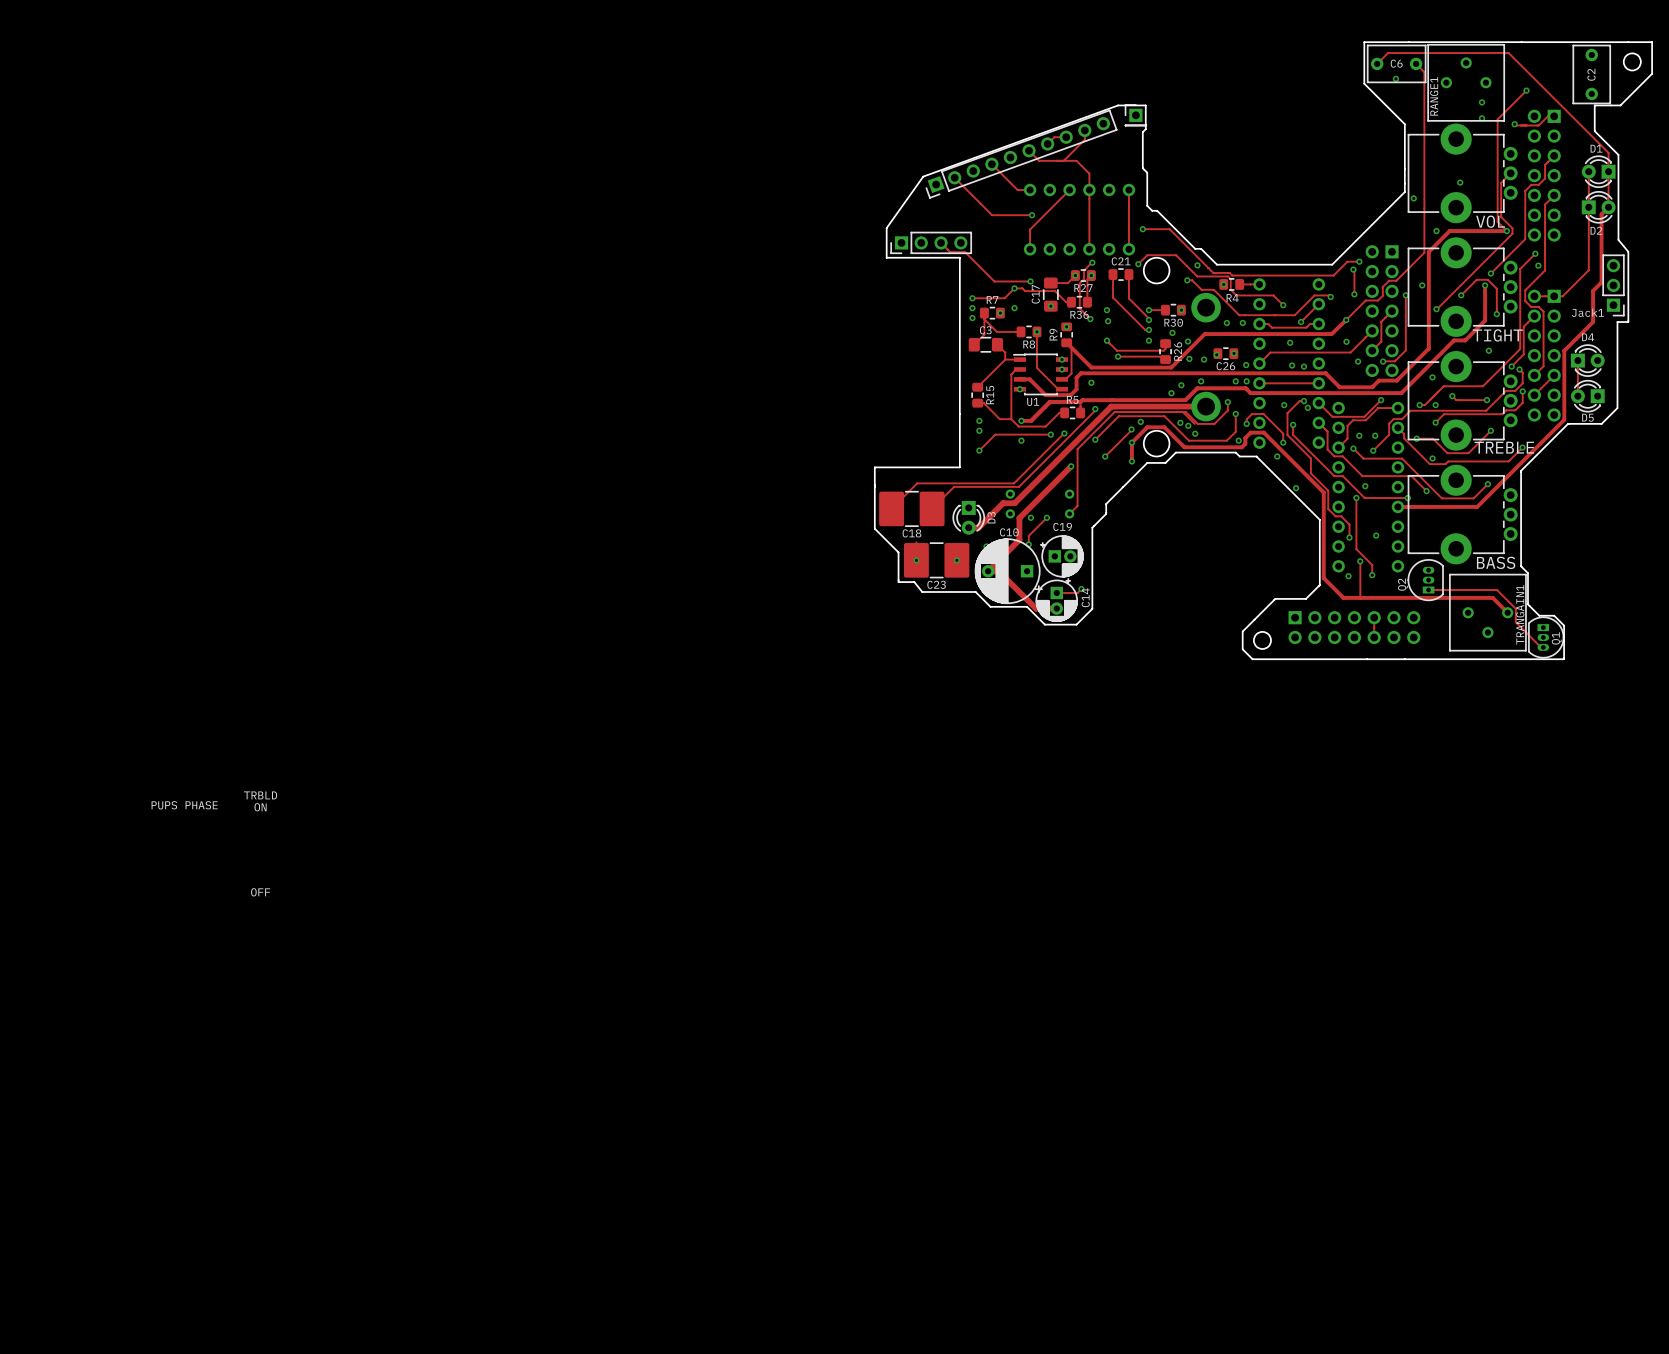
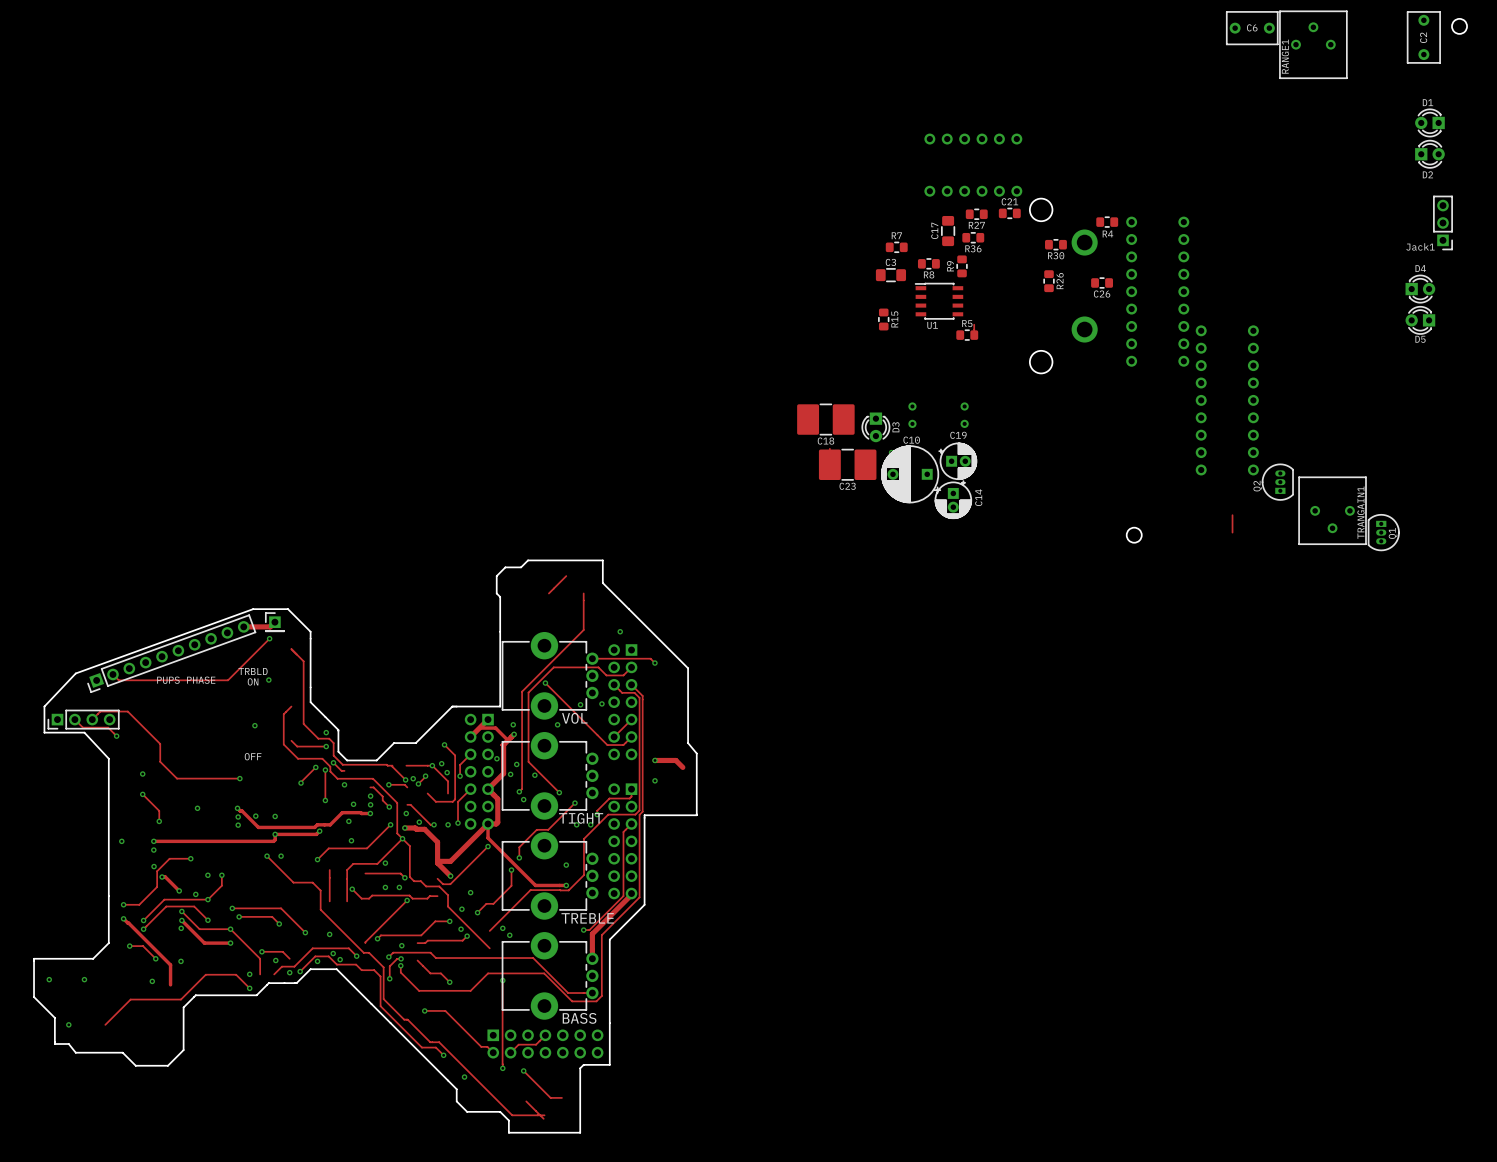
board edge: (1364, 42) (1652, 42) (1652, 73) (1620, 105) (1594, 105) (1594, 131) (1618, 154) (1618, 239) (1628, 251) (1628, 322) (1617, 322) (1617, 408) (1601, 423) (1568, 423) (1521, 470) (1521, 566) (1527, 573) (1527, 604) (1539, 615) (1554, 615) (1564, 625) (1564, 659) (1252, 659) (1242, 649) (1242, 631) (1275, 598) (1305, 598) (1319, 585) (1319, 519) (1256, 456) (1239, 456) (1235, 452) (1175, 452) (1165, 462) (1147, 462) (1106, 503) (1106, 513) (1092, 527) (1092, 608) (1076, 624) (1044, 624) (1027, 606) (990, 606) (975, 591) (922, 591) (914, 582) (898, 582) (898, 552) (874, 528) (874, 467) (959, 467) (959, 257) (886, 257) (886, 228) (923, 176) (1118, 105) (1145, 105) (1145, 129) (1142, 132) (1142, 168) (1147, 172) (1147, 205) (1152, 210) (1157, 210) (1195, 248) (1201, 248) (1216, 264) (1332, 264) (1404, 191) (1404, 124) (1364, 83) (1364, 42) -> none
track: (1377, 63) (1388, 53) (1508, 53) (1608, 152) (1608, 207) (1601, 214) (1601, 282) (1593, 290) (1593, 322) (1564, 350) (1564, 419) (1477, 506) (1397, 506) -> none
track: (1416, 63) (1424, 72) (1424, 252) (1396, 280) (1389, 280) (1382, 286) (1382, 295) (1378, 300) (1365, 300) (1331, 334) (1204, 334) (1171, 367) (1091, 367) (1066, 342) (1071, 347) (1071, 373) (1065, 379) (1061, 379) -> none
via: (1395, 78) -> none
track: (1526, 90) (1497, 119) (1497, 221) (1506, 231) (1449, 231) (1428, 251) (1428, 348) (1396, 380) (1378, 380) (1372, 387) (1339, 387) (1325, 373) (1080, 373) (1076, 377) (1076, 389) (1070, 395) (1045, 395) (1029, 379) (1019, 379) -> none
via: (1526, 90) -> none
via: (1482, 102) -> none
part: (1135, 115) -> none
track: (1554, 116) (1547, 116) (1538, 125) (1514, 124) -> none
via: (1482, 118) -> none
via: (1514, 124) -> none
track: (1084, 130) (1084, 139) (1063, 160) -> none
track: (1066, 137) (1054, 137) (1047, 143) -> none
track: (1029, 150) (1039, 160) (1076, 160) (1089, 173) (1089, 249) -> none
part: (1021, 154) -> none
track: (1554, 155) (1545, 165) (1545, 178) (1538, 184) (1531, 184) (1525, 191) (1525, 239) (1490, 273) -> none
track: (991, 164) (1017, 190) (1030, 190) -> none
track: (1588, 171) (1588, 270) (1562, 296) (1534, 296) -> none
VOL: (1462, 173) -> none
track: (1510, 173) (1501, 182) (1501, 216) (1512, 228) (1512, 233) (1436, 309) -> none
part: (1544, 175) -> none
track: (954, 177) (992, 215) (1032, 215) -> none
via: (1460, 182) -> none
track: (1069, 190) (1030, 229) (1030, 249) -> none
track: (1128, 190) (1128, 249) -> none
track: (1554, 195) (1545, 204) (1545, 270) (1525, 290) (1525, 301) (1531, 306) (1538, 306) (1543, 311) (1543, 366) (1534, 375) -> none
via: (1413, 198) -> none
via: (1032, 215) -> none
track: (1142, 229) (1169, 229) (1213, 272) (1229, 272) (1232, 275) (1333, 275) (1347, 261) (1359, 261) -> none
via: (1142, 229) -> none
via: (1436, 231) -> none
via: (1506, 231) -> none
part: (931, 242) -> none
track: (941, 242) (950, 252) (965, 252) (994, 281) (1030, 281) -> none
track: (1535, 253) (1520, 268) (1520, 349) (1482, 386) (1443, 386) (1424, 405) (1419, 405) -> none
via: (1535, 253) -> none
via: (1359, 261) -> none
track: (1092, 262) (1083, 270) (1083, 279) (1079, 283) (1079, 308) (1090, 319) -> none
via: (1092, 262) -> none
track: (1138, 264) (1147, 255) (1176, 255) (1197, 276) (1228, 276) (1230, 279) (1230, 289) (1236, 295) (1273, 295) (1283, 305) -> none
via: (1138, 264) -> none
via: (1197, 265) -> none
via: (1538, 265) -> none
track: (1353, 269) (1354, 294) -> none
via: (1353, 269) -> none
via: (1490, 273) -> none
track: (1112, 274) (1112, 297) (1145, 329) (1148, 329) -> none
track: (1128, 274) (1128, 298) (1148, 320) -> none
track: (1075, 275) (1067, 283) (1050, 283) -> none
via: (1075, 275) -> none
track: (1091, 275) (1087, 279) (1087, 302) -> none
via: (1091, 275) -> none
track: (1187, 280) (1192, 280) (1201, 289) (1213, 289) (1239, 315) (1294, 315) (1314, 295) (1330, 297) -> none
via: (1187, 280) -> none
via: (1030, 281) -> none
via: (1223, 284) -> none
track: (1239, 284) (1259, 284) -> none
via: (1422, 285) -> none
track: (1485, 285) (1485, 320) (1465, 340) (1454, 340) (1401, 393) (1250, 393) (1245, 388) (1197, 388) (1185, 400) (1082, 400) (1080, 402) (1050, 402) (1031, 420) (1021, 420) (1029, 420) (1049, 401) (1185, 401) (1197, 389) (1246, 389) -> none
via: (1485, 285) -> none
TIGHT: (1462, 287) -> none
via: (1014, 288) -> none
via: (1354, 294) -> none
track: (1405, 295) (1405, 350) (1394, 361) (1383, 361) -> none
via: (1405, 295) -> none
track: (1461, 295) (1476, 279) (1487, 279) (1496, 288) (1496, 314) -> none
via: (1461, 295) -> none
via: (1330, 297) -> none
track: (972, 298) (1004, 298) (1014, 288) (1022, 288) (1025, 291) (1055, 291) (1066, 302) (1071, 302) -> none
via: (972, 298) -> none
track: (1318, 304) (1301, 322) -> none
via: (1283, 305) -> none
via: (1050, 306) -> none
via: (972, 308) -> none
via: (1014, 308) -> none
via: (1436, 309) -> none
via: (1106, 310) -> none
track: (1148, 310) (1165, 310) -> none
via: (1148, 310) -> none
via: (1181, 310) -> none
part: (1382, 311) -> none
track: (1392, 311) (1381, 321) (1381, 341) (1372, 350) -> none
track: (984, 313) (984, 334) (974, 344) -> none
via: (1000, 313) -> none
via: (1496, 314) -> none
track: (1534, 316) (1523, 326) (1523, 354) (1511, 366) -> none
via: (972, 318) -> none
track: (984, 319) (997, 331) (1021, 331) -> none
via: (1090, 319) -> none
via: (1148, 320) -> none
via: (1346, 320) -> none
via: (1108, 321) -> none
via: (1301, 322) -> none
via: (1226, 323) -> none
via: (1242, 323) -> none
track: (1259, 324) (1268, 324) (1271, 327) (1306, 327) (1310, 324) (1318, 324) -> none
via: (1066, 326) -> none
via: (1148, 329) -> none
track: (1372, 330) (1350, 352) (1270, 352) (1259, 363) -> none
track: (1036, 331) (1036, 367) (1058, 389) (1061, 389) -> none
via: (1036, 331) -> none
via: (1172, 332) -> none
track: (1106, 340) (1116, 350) (1163, 350) (1165, 343) -> none
via: (1106, 340) -> none
via: (1148, 340) -> none
via: (1188, 341) -> none
via: (1346, 341) -> none
via: (1290, 342) -> none
track: (997, 344) (1005, 352) (1005, 359) -> none
via: (1488, 350) -> none
via: (1234, 353) -> none
via: (1216, 354) -> none
part: (1544, 355) -> none
track: (1118, 356) (1162, 356) (1165, 359) -> none
via: (1118, 356) -> none
via: (1189, 358) -> none
track: (1005, 359) (1019, 359) -> none
track: (1005, 359) (977, 387) -> none
via: (1061, 359) -> none
via: (1204, 359) -> none
track: (1577, 360) (1577, 396) -> none
via: (1358, 361) -> none
via: (1383, 361) -> none
via: (1246, 365) -> none
via: (1292, 365) -> none
via: (1303, 366) -> none
via: (1511, 366) -> none
track: (1019, 369) (1016, 369) (1011, 374) (1011, 419) -> none
via: (1061, 369) -> none
track: (1519, 369) (1522, 372) (1522, 383) (1515, 390) (1506, 390) (1486, 410) (1410, 410) (1402, 419) (1393, 419) (1389, 423) (1389, 434) (1373, 450) -> none
via: (1519, 369) -> none
track: (1554, 375) (1534, 395) -> none
via: (1432, 377) -> none
via: (1201, 381) -> none
via: (1235, 381) -> none
via: (1246, 381) -> none
via: (1091, 382) -> none
track: (1259, 383) (1318, 383) -> none
via: (1181, 385) -> none
via: (1019, 389) -> none
track: (1522, 391) (1522, 402) (1515, 410) (1506, 410) (1502, 414) (1444, 414) (1435, 422) -> none
via: (1522, 391) -> none
via: (1171, 393) -> none
track: (1452, 396) (1456, 400) (1486, 400) -> none
via: (1452, 396) -> none
track: (1381, 400) (1364, 416) (1332, 416) (1318, 403) -> none
via: (1381, 400) -> none
TREBLE: (1462, 400) -> none
via: (1486, 400) -> none
track: (1303, 401) (1299, 401) (1287, 413) (1287, 435) (1310, 458) (1310, 473) (1328, 490) (1328, 508) (1335, 516) (1341, 516) (1349, 524) (1349, 537) -> none
via: (1303, 401) -> none
track: (1227, 402) (1227, 410) (1214, 423) (1197, 423) (1185, 412) (1114, 412) (1077, 449) (1077, 505) (1069, 513) -> none
via: (1227, 402) -> none
track: (977, 403) (983, 403) (999, 419) (1011, 419) -> none
via: (1284, 405) -> none
via: (1419, 405) -> none
via: (1435, 405) -> none
track: (1206, 406) (1111, 406) (1014, 503) (1003, 503) (978, 527) (968, 527) -> none
via: (1307, 407) -> none
track: (1397, 408) (1378, 408) (1365, 420) (1353, 420) (1347, 425) (1347, 438) (1338, 447) -> none
track: (1095, 409) (1018, 486) (954, 486) (932, 508) -> none
via: (1095, 409) -> none
track: (1064, 412) (1059, 412) (1045, 426) (1018, 426) (1011, 419) -> none
track: (1182, 412) (1194, 423) -> none
track: (1235, 413) (1235, 431) (1226, 440) (1188, 440) (1164, 416) (1118, 416) (1095, 439) -> none
via: (1235, 413) -> none
via: (979, 420) -> none
via: (1021, 420) -> none
via: (1140, 421) -> none
via: (1180, 422) -> none
track: (1318, 422) (1327, 431) (1327, 449) (1334, 456) (1342, 456) (1362, 476) (1411, 476) (1426, 491) -> none
via: (1435, 422) -> none
track: (1246, 423) (1246, 419) (1251, 414) (1263, 414) (1283, 433) (1283, 442) -> none
via: (1246, 423) -> none
track: (1293, 424) (1293, 434) (1334, 476) (1342, 476) (1364, 498) (1407, 498) -> none
via: (1293, 424) -> none
via: (1188, 425) -> none
track: (1397, 427) (1404, 434) (1404, 438) (1429, 464) (1445, 464) (1448, 461) (1508, 461) (1522, 447) -> none
track: (1131, 429) (1105, 456) -> none
via: (1131, 429) -> none
via: (979, 430) -> none
track: (1490, 430) (1468, 453) (1447, 453) (1433, 438) (1416, 438) -> none
via: (1490, 430) -> none
track: (1064, 432) (1014, 483) (917, 483) (891, 508) -> none
via: (1064, 433) -> none
via: (1195, 433) -> none
track: (1050, 434) (995, 434) (979, 450) -> none
via: (1050, 434) -> none
via: (1359, 435) -> none
via: (1375, 435) -> none
via: (1416, 438) -> none
via: (1095, 439) -> none
via: (1021, 440) -> none
via: (1238, 440) -> none
via: (1131, 442) -> none
via: (1283, 442) -> none
via: (1522, 447) -> none
track: (1353, 448) (1363, 458) (1402, 458) (1441, 498) (1473, 498) (1487, 484) -> none
via: (1353, 448) -> none
via: (979, 450) -> none
via: (1373, 450) -> none
via: (1105, 456) -> none
via: (1277, 456) -> none
via: (1432, 458) -> none
track: (1131, 461) (1131, 442) (1147, 427) (1164, 427) (1184, 447) (1241, 447) (1245, 443) (1245, 438) (1250, 432) (1263, 432) (1323, 492) (1323, 578) (1343, 597) (1492, 597) (1507, 612) -> none
via: (1131, 461) -> none
track: (1071, 466) (1019, 518) (1019, 539) (988, 571) (998, 571) (1035, 608) (1056, 608) -> none
via: (1071, 466) -> none
via: (1487, 484) -> none
via: (1365, 486) -> none
via: (1296, 488) -> none
via: (1426, 491) -> none
track: (1356, 497) (1356, 549) (1372, 564) (1372, 575) -> none
via: (1356, 497) -> none
via: (1407, 498) -> none
BASS: (1462, 514) -> none
via: (1030, 517) -> none
track: (1046, 517) (1028, 535) (1028, 544) -> none
via: (1046, 517) -> none
via: (1376, 535) -> none
via: (1349, 537) -> none
via: (1028, 544) -> none
via: (916, 560) -> none
via: (956, 560) -> none
track: (1360, 561) (1360, 597) -> none
via: (1360, 561) -> none
via: (1372, 575) -> none
via: (1348, 576) -> none
track: (1081, 589) (1077, 592) (1056, 592) -> none
via: (1081, 589) -> none
track: (1428, 590) (1497, 590) (1515, 608) (1515, 622) (1540, 647) (1543, 647) -> none
part: (1354, 627) -> none
board edge: none -> (528, 560) (521, 567) (505, 567) (496, 576) (496, 593) (500, 596) (500, 706) (452, 706) (415, 743) (394, 743) (376, 760) (347, 760) (338, 751) (338, 730) (310, 702) (310, 631) (287, 609) (253, 609) (75, 673) (44, 706) (44, 732) (84, 732) (108, 758) (108, 943) (93, 958) (34, 958) (34, 997) (54, 1017) (54, 1044) (68, 1044) (75, 1052) (122, 1052) (135, 1065) (167, 1065) (183, 1050) (183, 1007) (195, 995) (256, 995) (268, 983) (296, 983) (310, 969) (336, 969) (456, 1089) (456, 1101) (467, 1111) (500, 1111) (508, 1120) (508, 1132) (580, 1132) (580, 1068) (583, 1064) (609, 1064) (609, 939) (644, 904) (644, 815) (696, 815) (696, 753) (688, 743) (688, 668) (602, 583) (602, 560) (528, 560)
track: none -> (566, 576) (548, 593)
track: none -> (583, 593) (583, 630) (522, 691) (522, 789) (519, 791)
track: none -> (274, 622) (270, 626) (243, 626)
part: none -> (274, 622)
via: none -> (620, 631)
track: none -> (269, 638) (228, 680) (118, 680) (112, 674)
via: none -> (269, 638)
track: none -> (291, 649) (303, 661) (303, 723) (318, 738) (329, 738) (333, 743) (333, 755) (342, 764) (392, 765) (405, 779)
part: none -> (171, 653)
track: none -> (592, 658) (650, 658) (654, 663)
via: none -> (654, 663)
track: none -> (631, 667) (623, 675) (606, 675) (598, 667) (553, 667) (528, 692) (528, 761) (559, 792)
VOL: none -> (550, 675)
via: none -> (268, 680)
track: none -> (545, 683) (607, 745) (623, 745) (631, 736)
via: none -> (545, 683)
track: none -> (614, 684) (622, 692) (634, 692) (639, 697) (639, 810) (635, 814) (608, 814) (584, 838) (584, 875) (568, 890) (530, 890) (489, 930)
track: none -> (631, 684) (642, 695) (642, 811) (639, 814) (639, 897) (601, 935) (601, 995) (596, 1001) (572, 1001) (544, 973) (488, 973) (470, 990) (419, 990) (400, 972) (400, 965)
part: none -> (622, 702)
via: none -> (601, 703)
via: none -> (580, 704)
track: none -> (291, 706) (283, 714) (283, 744) (298, 758) (322, 758) (330, 766) (330, 771) (337, 778) (373, 778) (397, 802) (397, 833) (409, 846) (409, 877) (414, 881) (420, 881) (426, 886) (439, 886) (448, 895) (448, 906) (489, 948)
track: none -> (74, 719) (82, 727) (108, 727) (116, 736)
part: none -> (83, 719)
track: none -> (92, 719) (100, 711) (127, 711) (160, 743) (160, 761) (177, 778) (239, 778)
track: none -> (488, 719) (470, 736) (479, 728) (495, 728) (508, 740)
track: none -> (631, 719) (616, 734)
via: none -> (513, 724)
via: none -> (557, 724)
via: none -> (254, 725)
via: none -> (326, 732)
via: none -> (514, 734)
via: none -> (116, 736)
track: none -> (291, 740) (297, 746) (326, 746)
track: none -> (444, 744) (455, 755) (455, 799) (452, 801) (435, 801) (427, 793)
via: none -> (444, 744)
via: none -> (326, 746)
track: none -> (470, 754) (460, 764) (460, 776)
via: none -> (496, 758)
track: none -> (655, 760) (675, 760) (682, 767)
via: none -> (655, 760)
track: none -> (333, 762) (341, 770) (344, 770)
via: none -> (333, 762)
via: none -> (441, 763)
via: none -> (516, 764)
track: none -> (406, 765) (432, 765) (448, 781) (448, 793)
via: none -> (432, 765)
track: none -> (315, 767) (301, 783)
via: none -> (315, 767)
track: none -> (325, 770) (325, 800)
via: none -> (325, 770)
part: none -> (479, 771)
via: none -> (447, 772)
via: none -> (142, 774)
via: none -> (510, 774)
via: none -> (534, 775)
track: none -> (425, 776) (418, 783)
via: none -> (425, 776)
via: none -> (460, 776)
TIGHT: none -> (550, 775)
via: none -> (239, 778)
via: none -> (413, 778)
via: none -> (405, 779)
via: none -> (655, 780)
via: none -> (301, 783)
via: none -> (418, 783)
via: none -> (344, 784)
track: none -> (388, 784) (404, 784) (407, 787)
via: none -> (388, 784)
track: none -> (370, 787) (373, 787) (382, 796) (382, 800) (389, 807)
track: none -> (470, 789) (458, 801) (458, 823)
track: none -> (488, 789) (501, 775) (501, 745) (501, 745) (503, 745) (514, 734) (503, 744) (503, 773) (488, 789)
track: none -> (488, 789) (497, 798) (497, 822) (488, 823)
track: none -> (631, 789) (629, 798) (609, 798) (597, 810) (597, 814)
via: none -> (519, 791)
via: none -> (559, 792)
track: none -> (142, 794) (159, 810) (159, 821)
via: none -> (142, 794)
via: none -> (370, 796)
via: none -> (523, 799)
via: none -> (325, 800)
track: none -> (574, 803) (548, 829) (536, 829) (519, 847) (519, 857)
via: none -> (574, 803)
via: none -> (353, 804)
via: none -> (370, 804)
track: none -> (407, 804) (410, 804) (430, 824) (434, 824)
via: none -> (389, 807)
via: none -> (197, 808)
track: none -> (237, 808) (258, 827) (314, 827) (317, 824) (330, 824) (342, 812) (370, 813)
via: none -> (237, 808)
via: none -> (370, 813)
via: none -> (406, 813)
via: none -> (597, 814)
via: none -> (255, 816)
via: none -> (238, 817)
via: none -> (275, 816)
via: none -> (159, 821)
via: none -> (348, 821)
via: none -> (419, 822)
via: none -> (458, 823)
track: none -> (488, 823) (488, 837) (535, 885) (566, 885)
track: none -> (488, 823) (450, 861) (437, 861)
track: none -> (631, 823) (623, 832) (623, 896) (589, 930) (583, 930)
track: none -> (390, 824) (367, 848) (328, 848) (317, 859)
via: none -> (390, 824)
via: none -> (434, 824)
via: none -> (448, 824)
via: none -> (576, 824)
via: none -> (590, 824)
via: none -> (238, 825)
track: none -> (404, 828) (424, 829) (437, 842) (437, 863) (450, 876)
via: none -> (404, 828)
track: none -> (319, 831) (316, 834) (275, 834) (273, 841) (153, 841)
via: none -> (319, 831)
via: none -> (275, 834)
track: none -> (402, 838) (377, 863) (353, 863) (347, 870) (347, 901)
via: none -> (402, 838)
via: none -> (351, 840)
via: none -> (121, 841)
via: none -> (153, 841)
part: none -> (622, 841)
track: none -> (488, 846) (450, 884) (443, 884) (437, 878)
via: none -> (488, 846)
via: none -> (153, 850)
track: none -> (267, 856) (293, 882) (312, 882) (320, 890) (320, 909) (363, 952) (369, 952) (383, 967) (383, 999) (404, 1019) (407, 1019) (430, 1042) (439, 1042) (512, 1115) (544, 1115)
via: none -> (267, 856)
via: none -> (281, 856)
via: none -> (519, 857)
track: none -> (190, 858) (169, 858) (157, 871) (157, 886) (139, 904) (123, 904)
via: none -> (190, 858)
via: none -> (317, 859)
via: none -> (385, 863)
via: none -> (566, 865)
via: none -> (154, 866)
track: none -> (329, 870) (329, 901)
track: none -> (511, 870) (511, 885) (493, 903) (486, 903) (477, 912)
via: none -> (511, 870)
track: none -> (365, 873) (400, 873) (404, 877)
via: none -> (207, 875)
track: none -> (221, 875) (221, 885) (207, 899) (164, 899) (143, 920)
via: none -> (221, 875)
TREBLE: none -> (550, 875)
via: none -> (450, 876)
track: none -> (162, 877) (165, 877) (179, 890)
via: none -> (162, 877)
via: none -> (404, 877)
via: none -> (566, 885)
via: none -> (385, 887)
via: none -> (399, 887)
track: none -> (352, 889) (361, 898) (369, 898) (372, 895) (409, 895) (412, 898) (437, 896)
via: none -> (352, 889)
via: none -> (179, 890)
via: none -> (470, 892)
track: none -> (631, 893) (592, 933) (592, 958)
via: none -> (195, 894)
via: none -> (207, 899)
track: none -> (407, 900) (365, 943)
via: none -> (407, 900)
via: none -> (123, 904)
track: none -> (232, 908) (281, 908) (305, 932)
via: none -> (232, 908)
via: none -> (461, 909)
track: none -> (181, 911) (199, 929) (230, 929) (260, 958) (260, 974)
via: none -> (181, 911)
via: none -> (477, 912)
track: none -> (239, 916) (272, 916) (279, 923)
via: none -> (239, 916)
track: none -> (123, 918) (170, 965) (170, 984)
via: none -> (123, 918)
via: none -> (143, 920)
track: none -> (181, 920) (204, 943) (230, 943)
via: none -> (181, 920)
track: none -> (207, 920) (194, 906) (166, 906) (143, 929)
via: none -> (207, 920)
track: none -> (449, 921) (435, 921) (421, 935) (380, 935) (377, 938)
via: none -> (449, 921)
via: none -> (279, 923)
via: none -> (181, 928)
via: none -> (502, 928)
via: none -> (143, 929)
via: none -> (230, 929)
via: none -> (461, 929)
via: none -> (583, 930)
via: none -> (305, 932)
via: none -> (329, 934)
via: none -> (509, 935)
track: none -> (467, 936) (462, 940) (427, 940) (425, 943) (417, 943)
via: none -> (467, 936)
via: none -> (377, 938)
via: none -> (230, 943)
track: none -> (129, 946) (143, 946) (155, 958)
via: none -> (129, 946)
via: none -> (401, 945)
track: none -> (261, 951) (282, 951) (289, 958)
via: none -> (261, 951)
via: none -> (333, 953)
track: none -> (356, 956) (348, 948) (312, 948) (294, 966) (281, 966) (274, 974)
via: none -> (356, 956)
track: none -> (388, 957) (393, 952) (430, 952) (435, 958) (533, 958) (568, 993) (592, 993)
via: none -> (388, 957)
via: none -> (155, 958)
track: none -> (401, 958) (397, 958) (389, 966) (389, 978)
via: none -> (401, 958)
via: none -> (340, 959)
via: none -> (275, 960)
track: none -> (417, 960) (430, 973) (440, 973) (449, 982)
via: none -> (181, 961)
via: none -> (317, 961)
via: none -> (400, 965)
track: none -> (300, 971) (315, 956) (328, 956) (336, 964) (356, 964) (361, 970) (374, 970) (380, 976) (380, 1006) (421, 1047) (435, 1047) (443, 1055)
via: none -> (300, 971)
via: none -> (289, 972)
via: none -> (249, 974)
BASS: none -> (550, 975)
via: none -> (389, 978)
via: none -> (49, 979)
via: none -> (84, 979)
track: none -> (502, 980) (502, 1068)
via: none -> (502, 980)
via: none -> (152, 981)
via: none -> (449, 982)
track: none -> (249, 988) (236, 974) (205, 974) (180, 999) (130, 999) (105, 1024)
via: none -> (249, 988)
track: none -> (424, 1010) (445, 1010) (481, 1046) (487, 1046) (493, 1052)
via: none -> (424, 1010)
via: none -> (68, 1024)
track: none -> (545, 1035) (536, 1044) (518, 1044) (510, 1052)
part: none -> (545, 1044)
via: none -> (443, 1055)
via: none -> (502, 1068)
track: none -> (523, 1070) (550, 1097) (561, 1097)
via: none -> (523, 1070)
via: none -> (464, 1077)
track: none -> (526, 1101) (543, 1118)

